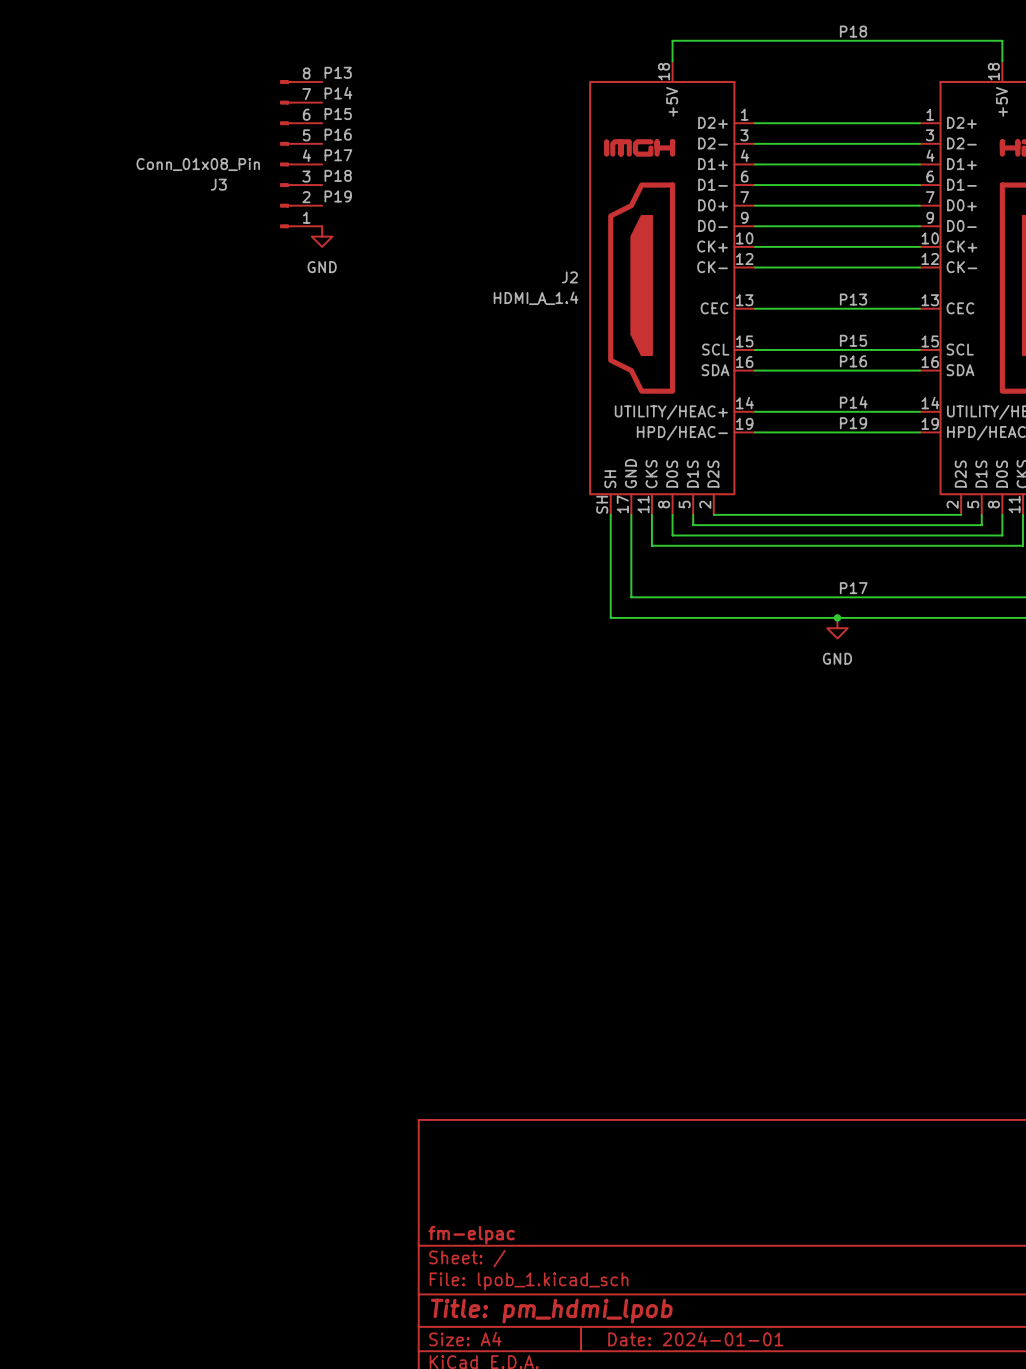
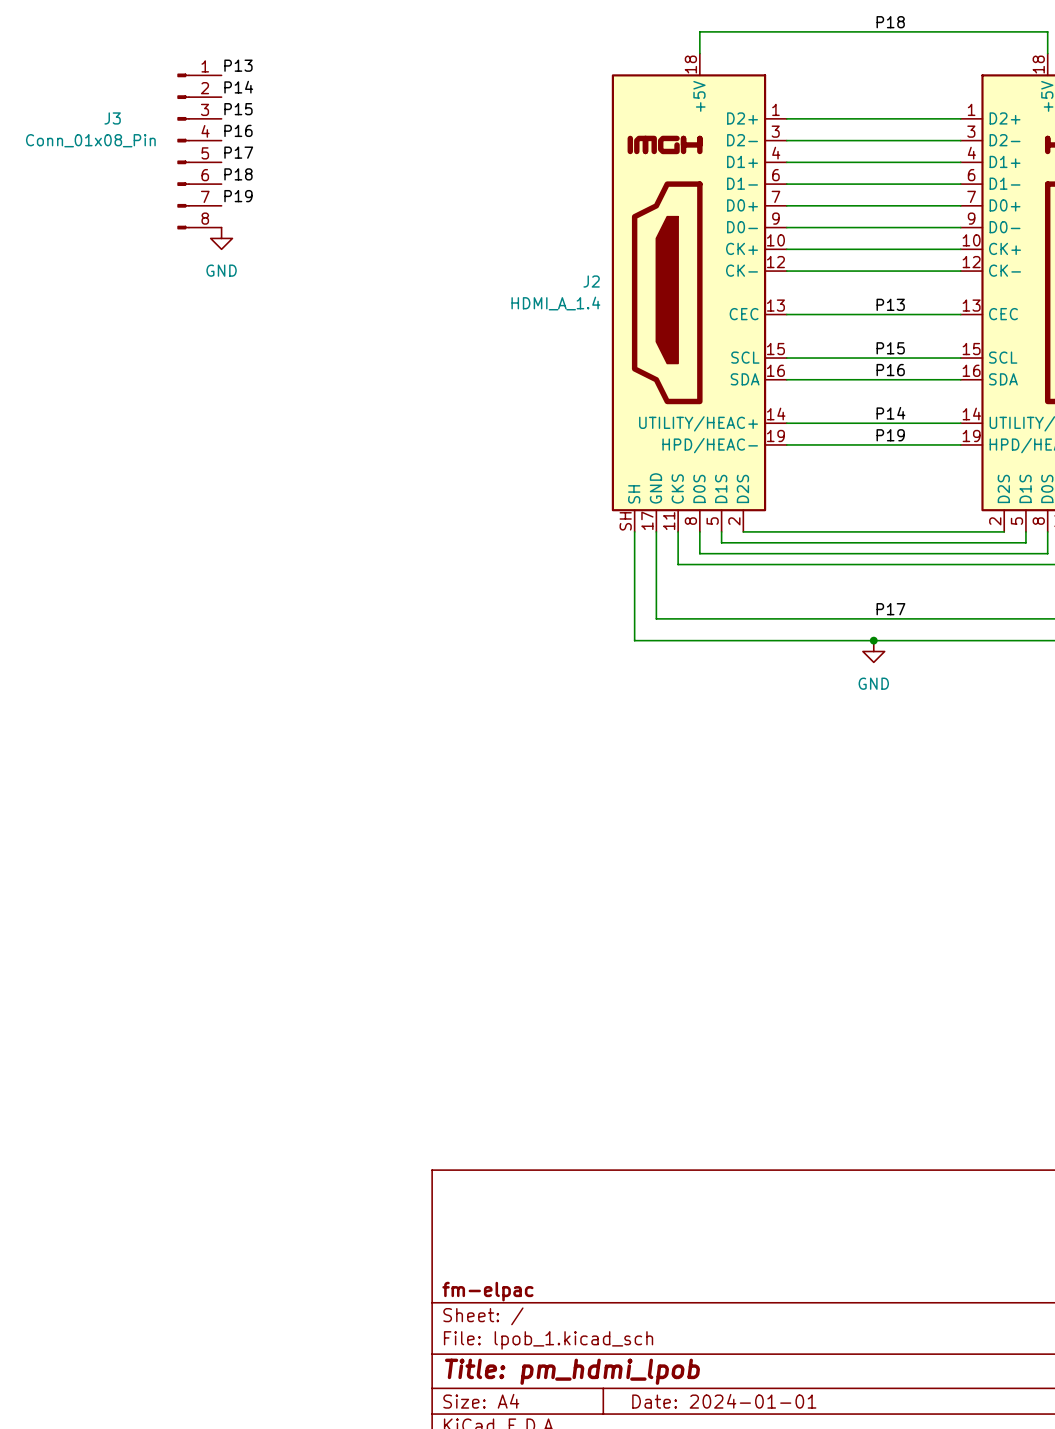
label position: P13 (338, 72) -> P13 (238, 65)
label position: P14 (338, 93) -> P14 (238, 87)
label position: P15 (338, 114) -> P15 (238, 109)
label position: P16 (338, 134) -> P16 (238, 130)
J3 flip: as is (286, 154) -> up-down (183, 151)
J3 position: (301, 154) -> (199, 151)
label position: P17 (338, 155) -> P17 (238, 152)
label position: P18 (338, 175) -> P18 (238, 174)
label position: P19 (338, 196) -> P19 (238, 196)
power symbol position: GND (322, 236) -> GND (221, 238)

